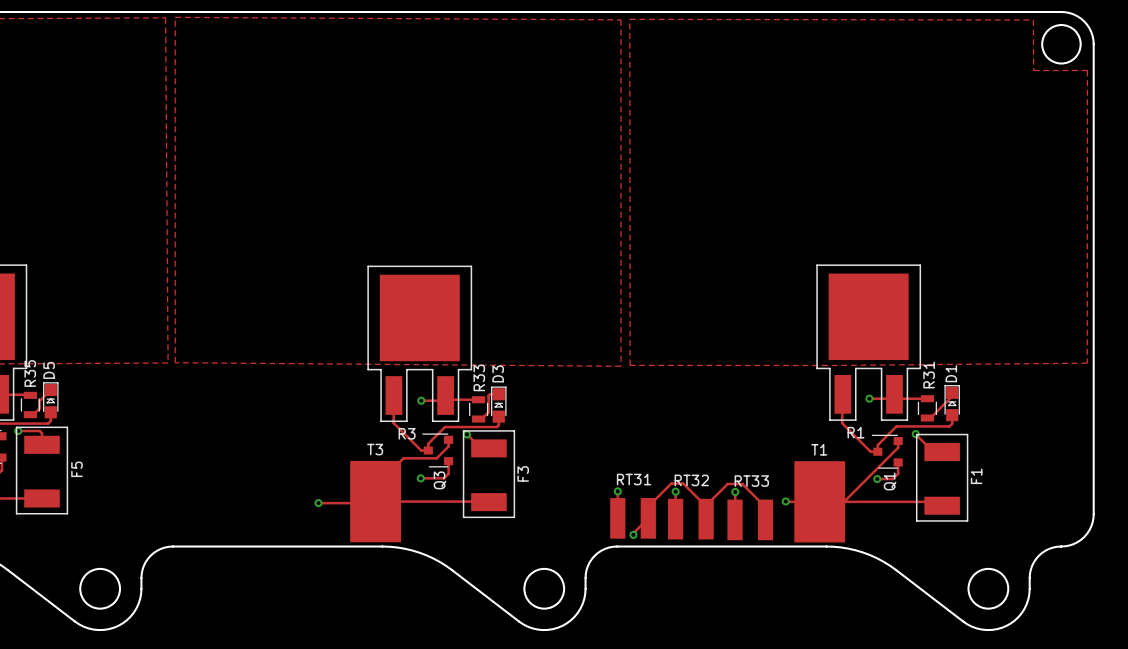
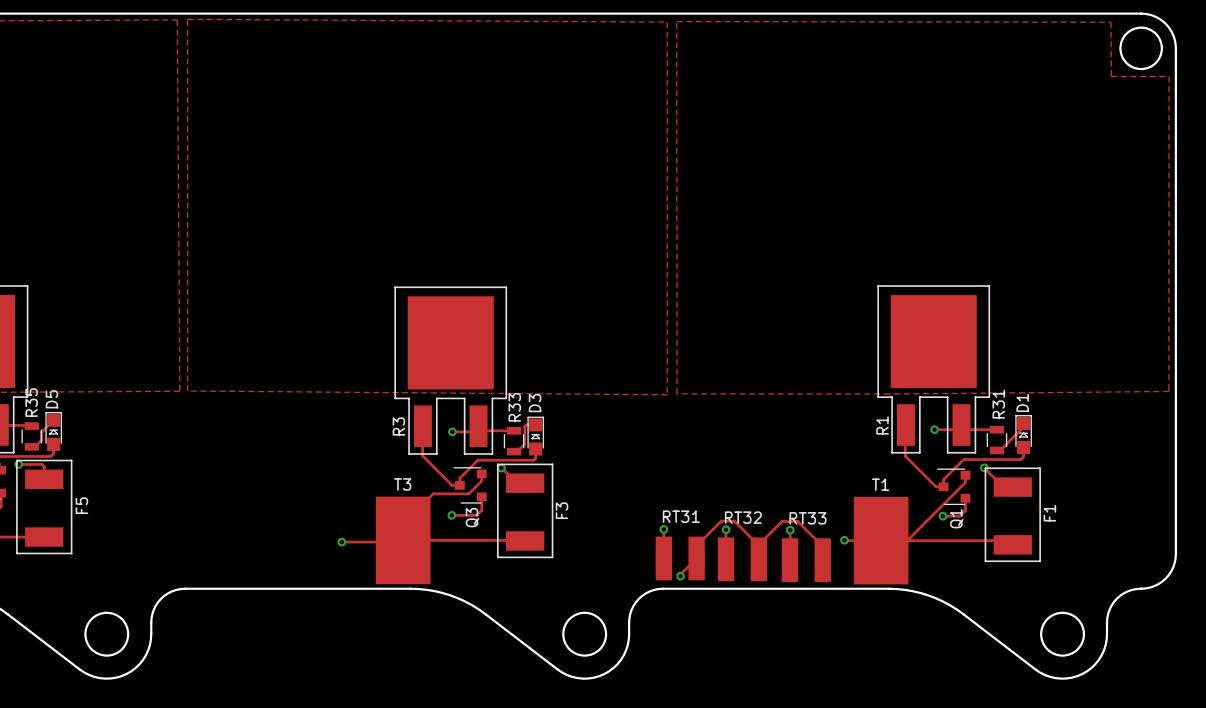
R1 name rotation: 0° (856, 432) -> 90° counterclockwise (882, 425)
R1 name position: R1 (856, 432) -> R1 (882, 425)
R3 name rotation: 0° (407, 433) -> 90° counterclockwise (398, 426)
R3 name position: R3 (407, 433) -> R3 (398, 426)

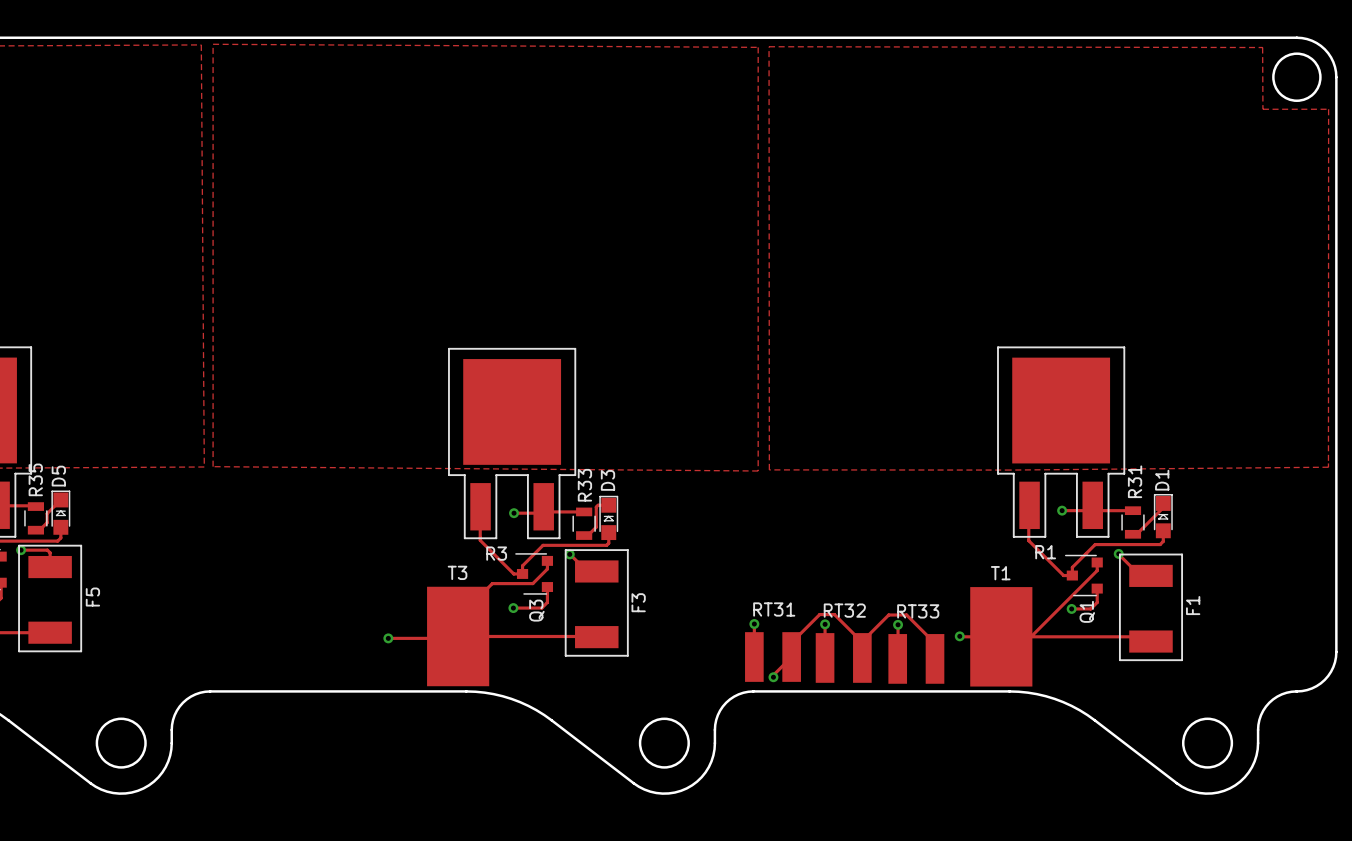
R1 name rotation: 0° (882, 425) -> 90° clockwise (1045, 552)
R1 name position: R1 (882, 425) -> R1 (1045, 552)
R3 name rotation: 0° (398, 426) -> 90° clockwise (496, 553)
R3 name position: R3 (398, 426) -> R3 (496, 553)

